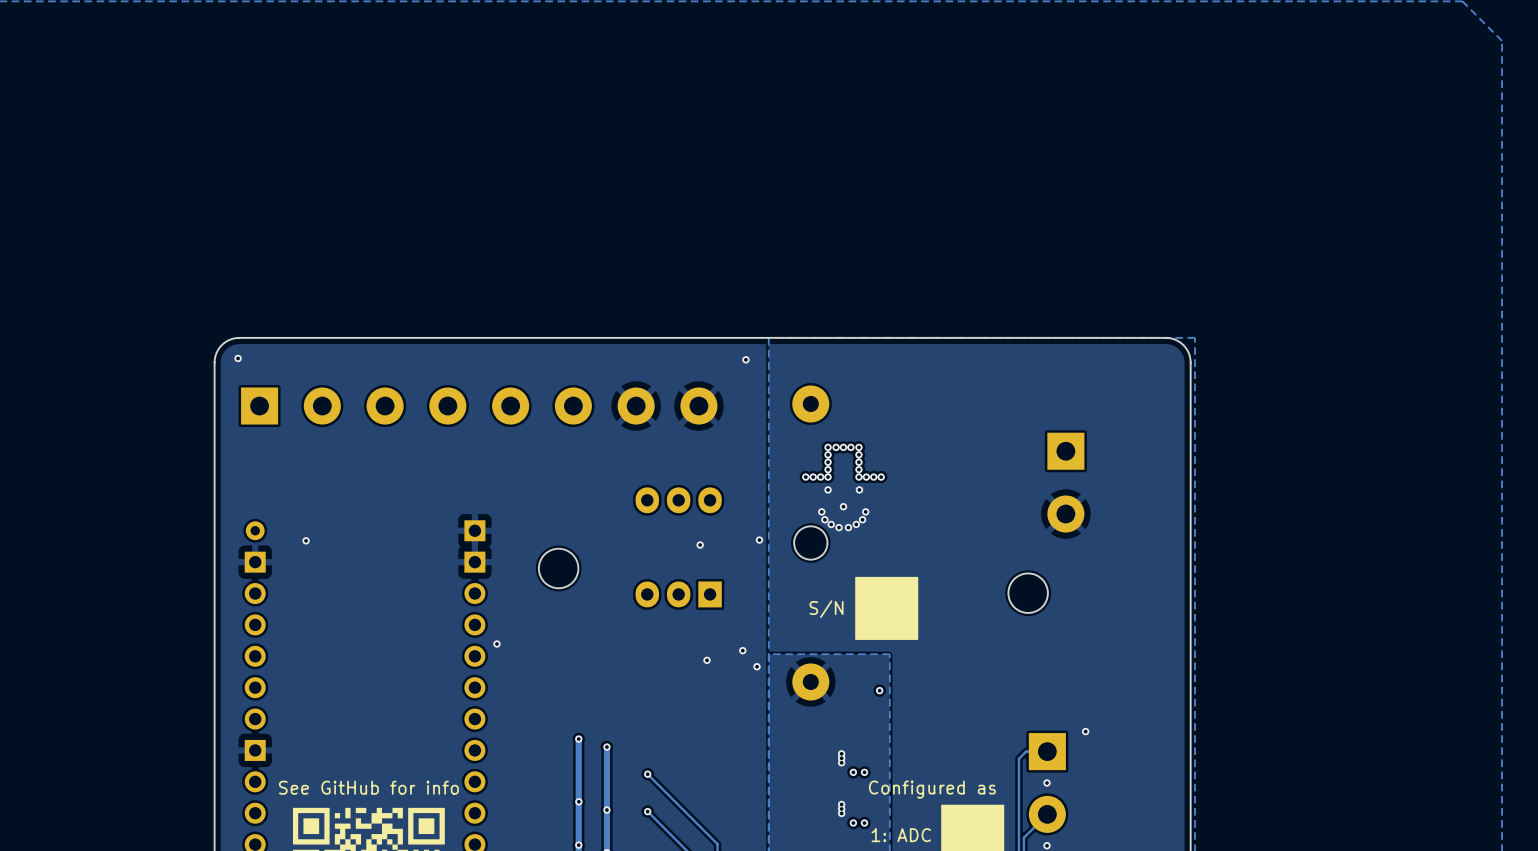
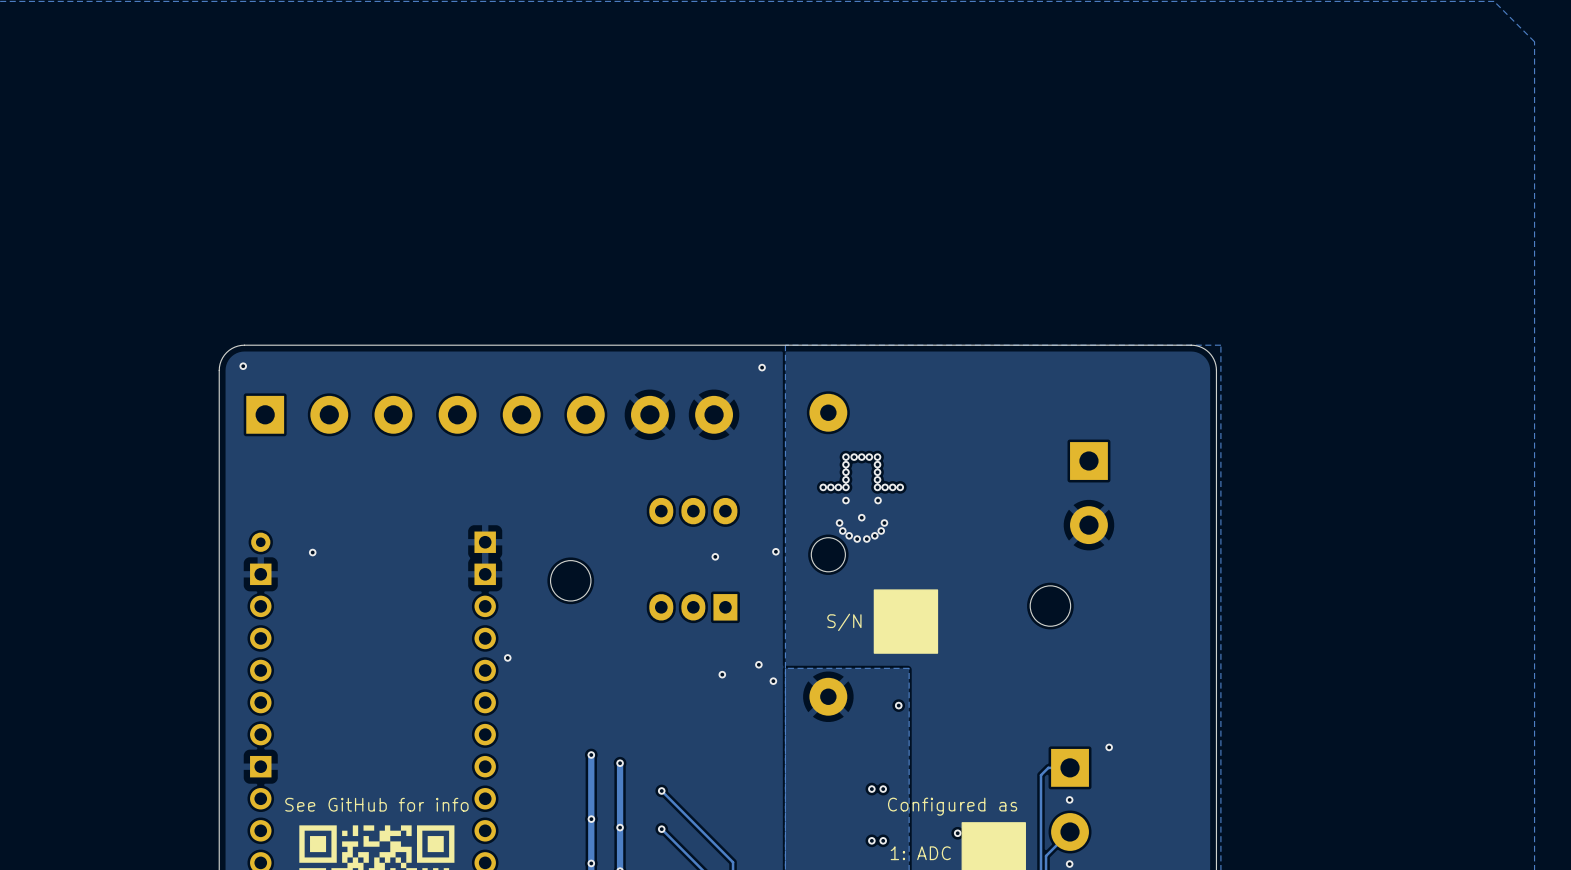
via: (841, 753) -> none
via: (841, 758) -> none
via: (841, 762) -> none
via: (841, 804) -> none
via: (841, 808) -> none
via: (841, 813) -> none
via: none -> (957, 833)

